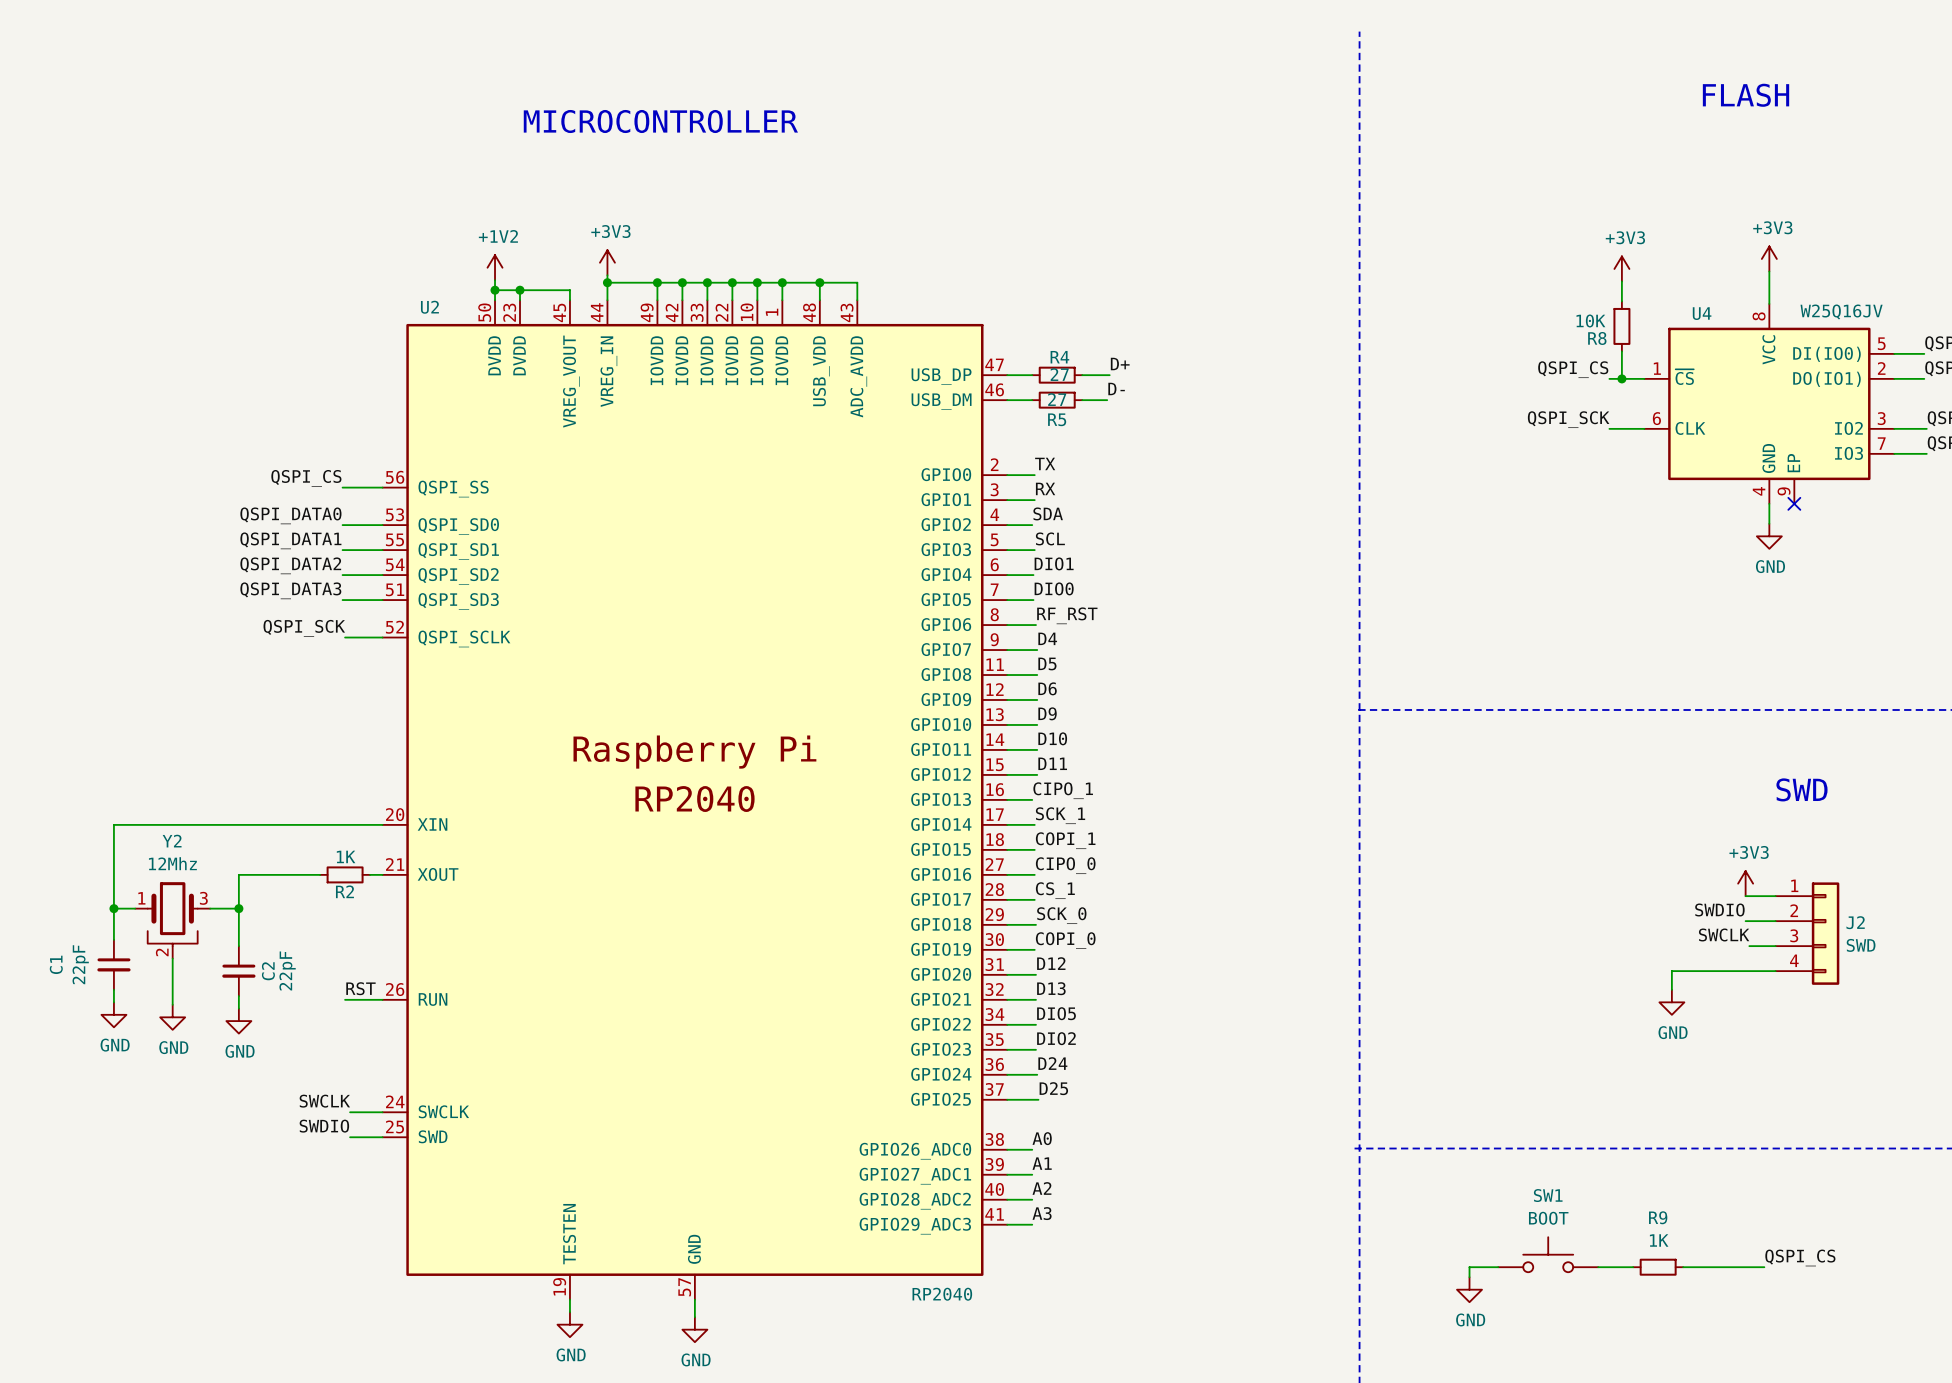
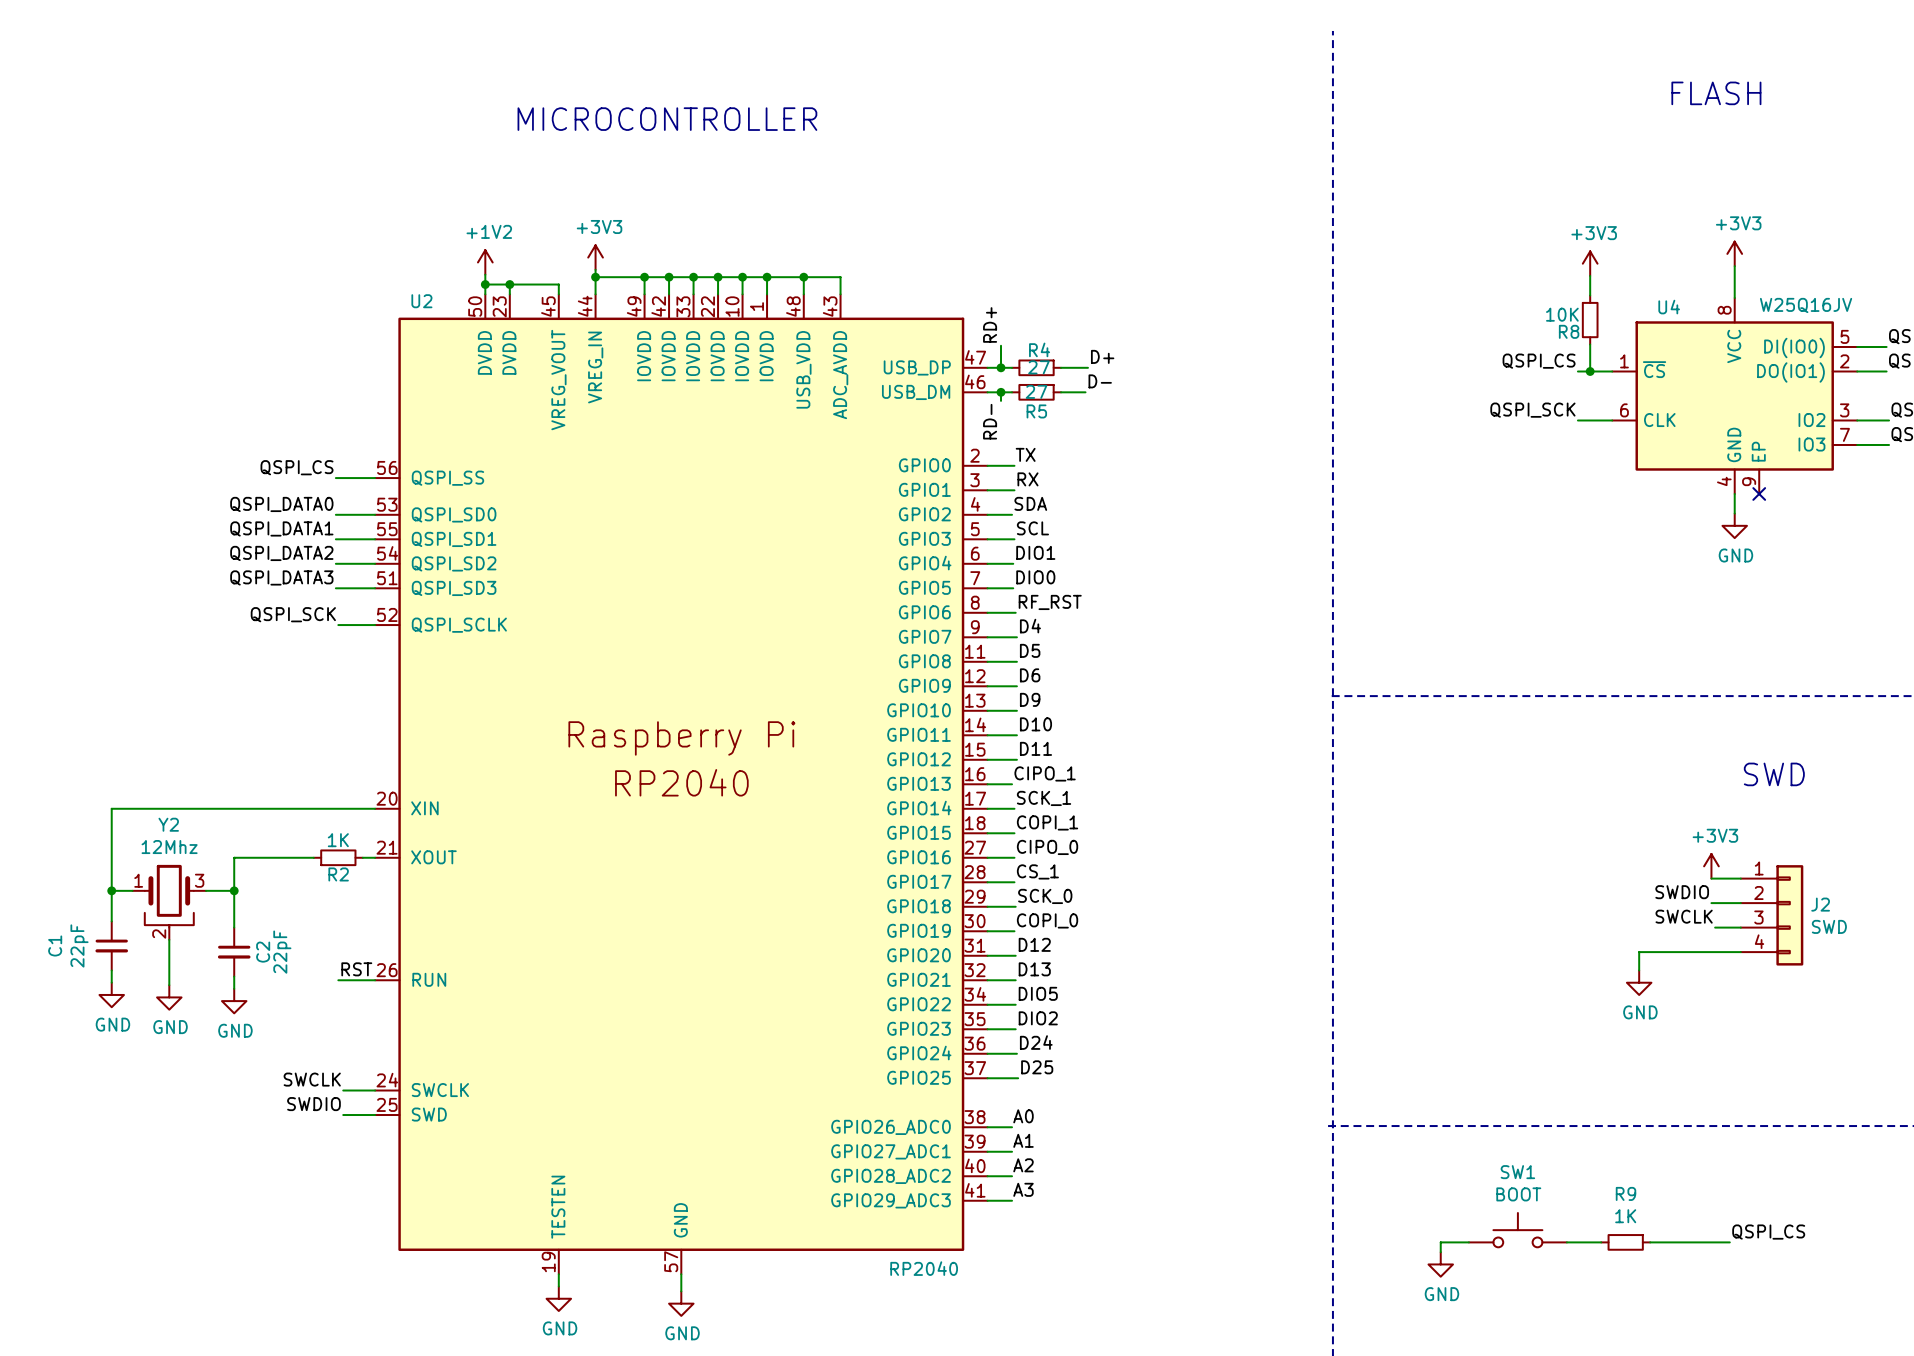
label: none -> RD+ (990, 324)
wire: none -> (1001, 345) (1001, 367)
junction: none -> (1001, 367)
wire: none -> (1001, 392) (1001, 400)
junction: none -> (1001, 392)
label: none -> RD- (990, 421)

